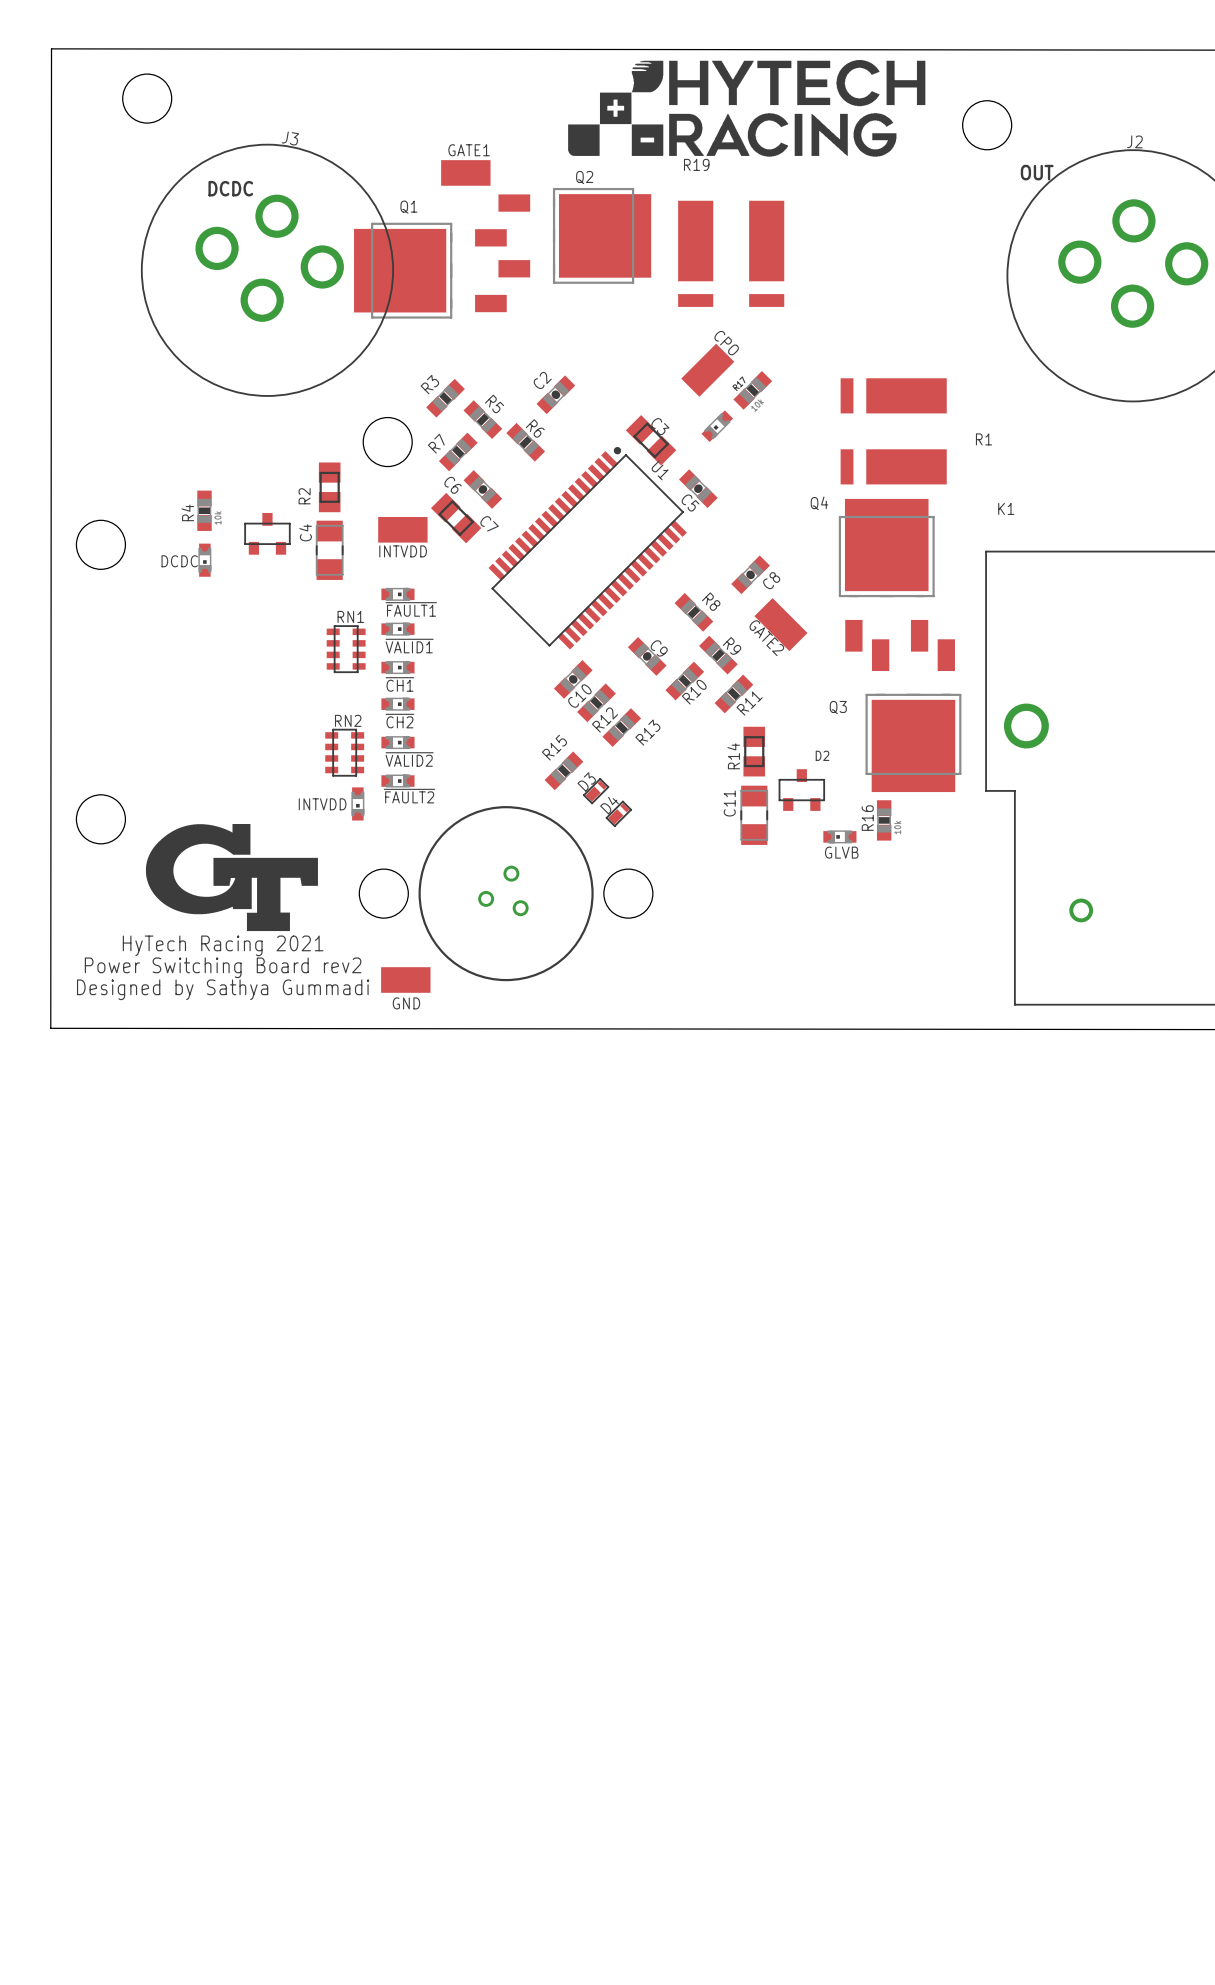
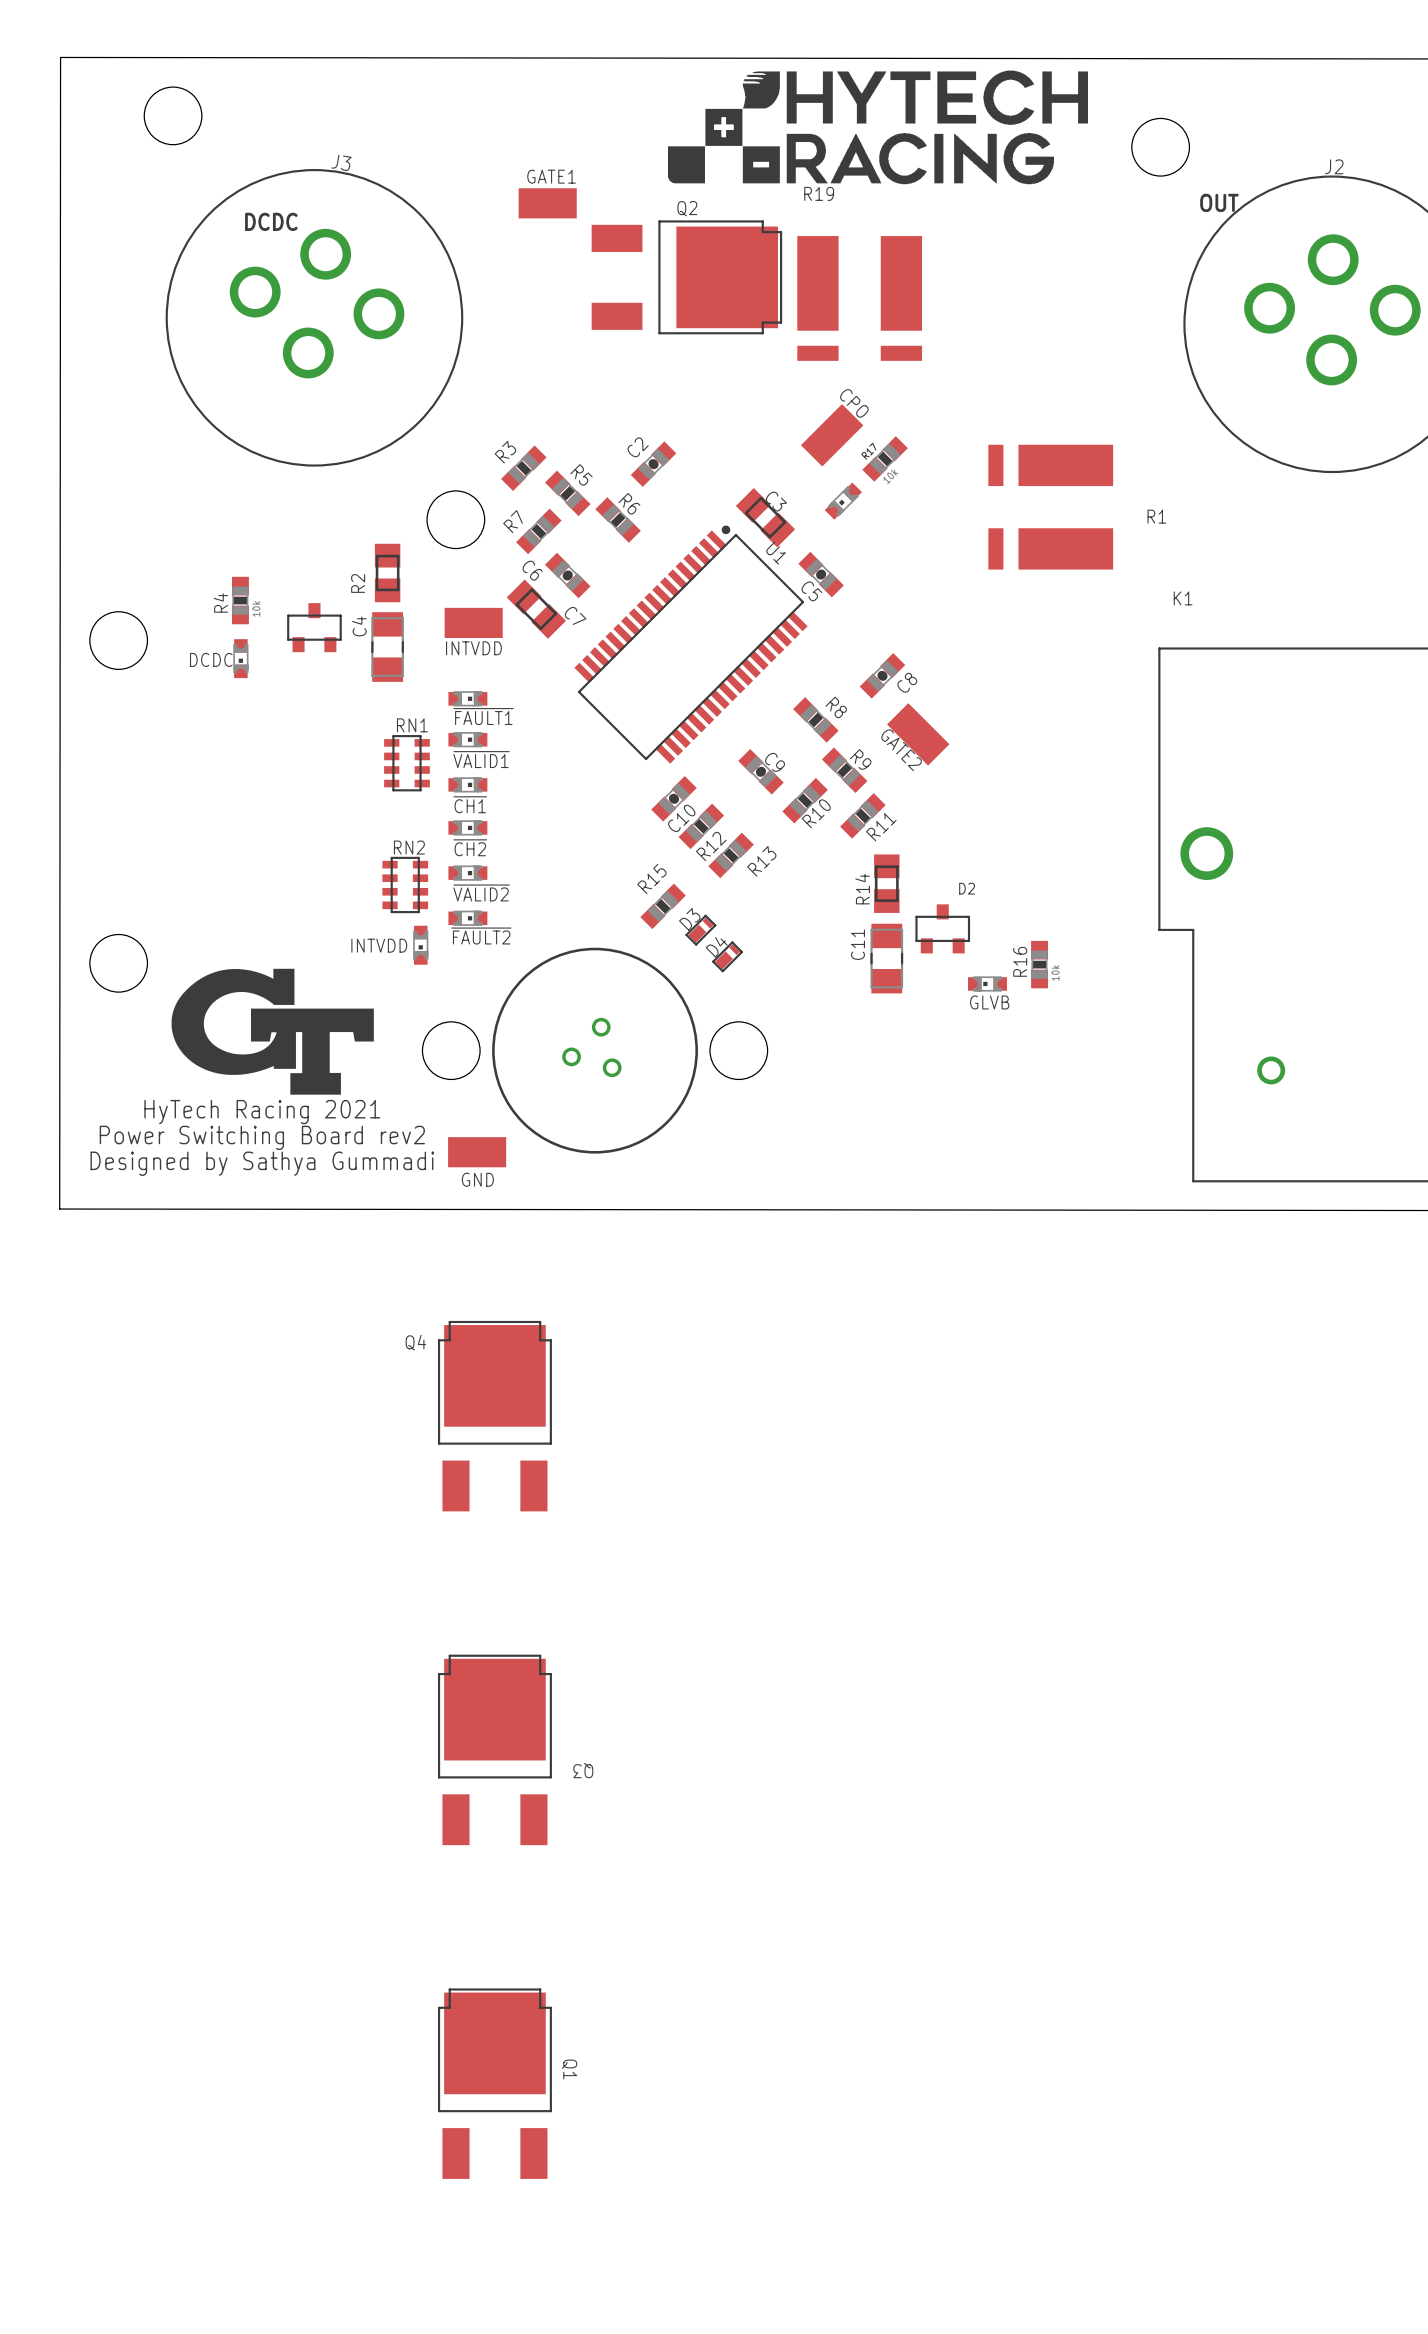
Q2 footprint: [498, 187, 652, 284] -> [591, 220, 783, 335]
Q1 name position: Q1 (408, 207) -> Q1 (569, 2069)
Q1 footprint: [354, 222, 507, 319] -> [437, 1988, 552, 2179]
Q4 footprint: [838, 498, 935, 652] -> [437, 1320, 552, 1512]
Q3 footprint: [865, 639, 962, 793] -> [437, 1654, 552, 1846]
Q3 name position: Q3 (838, 707) -> Q3 (583, 1770)

